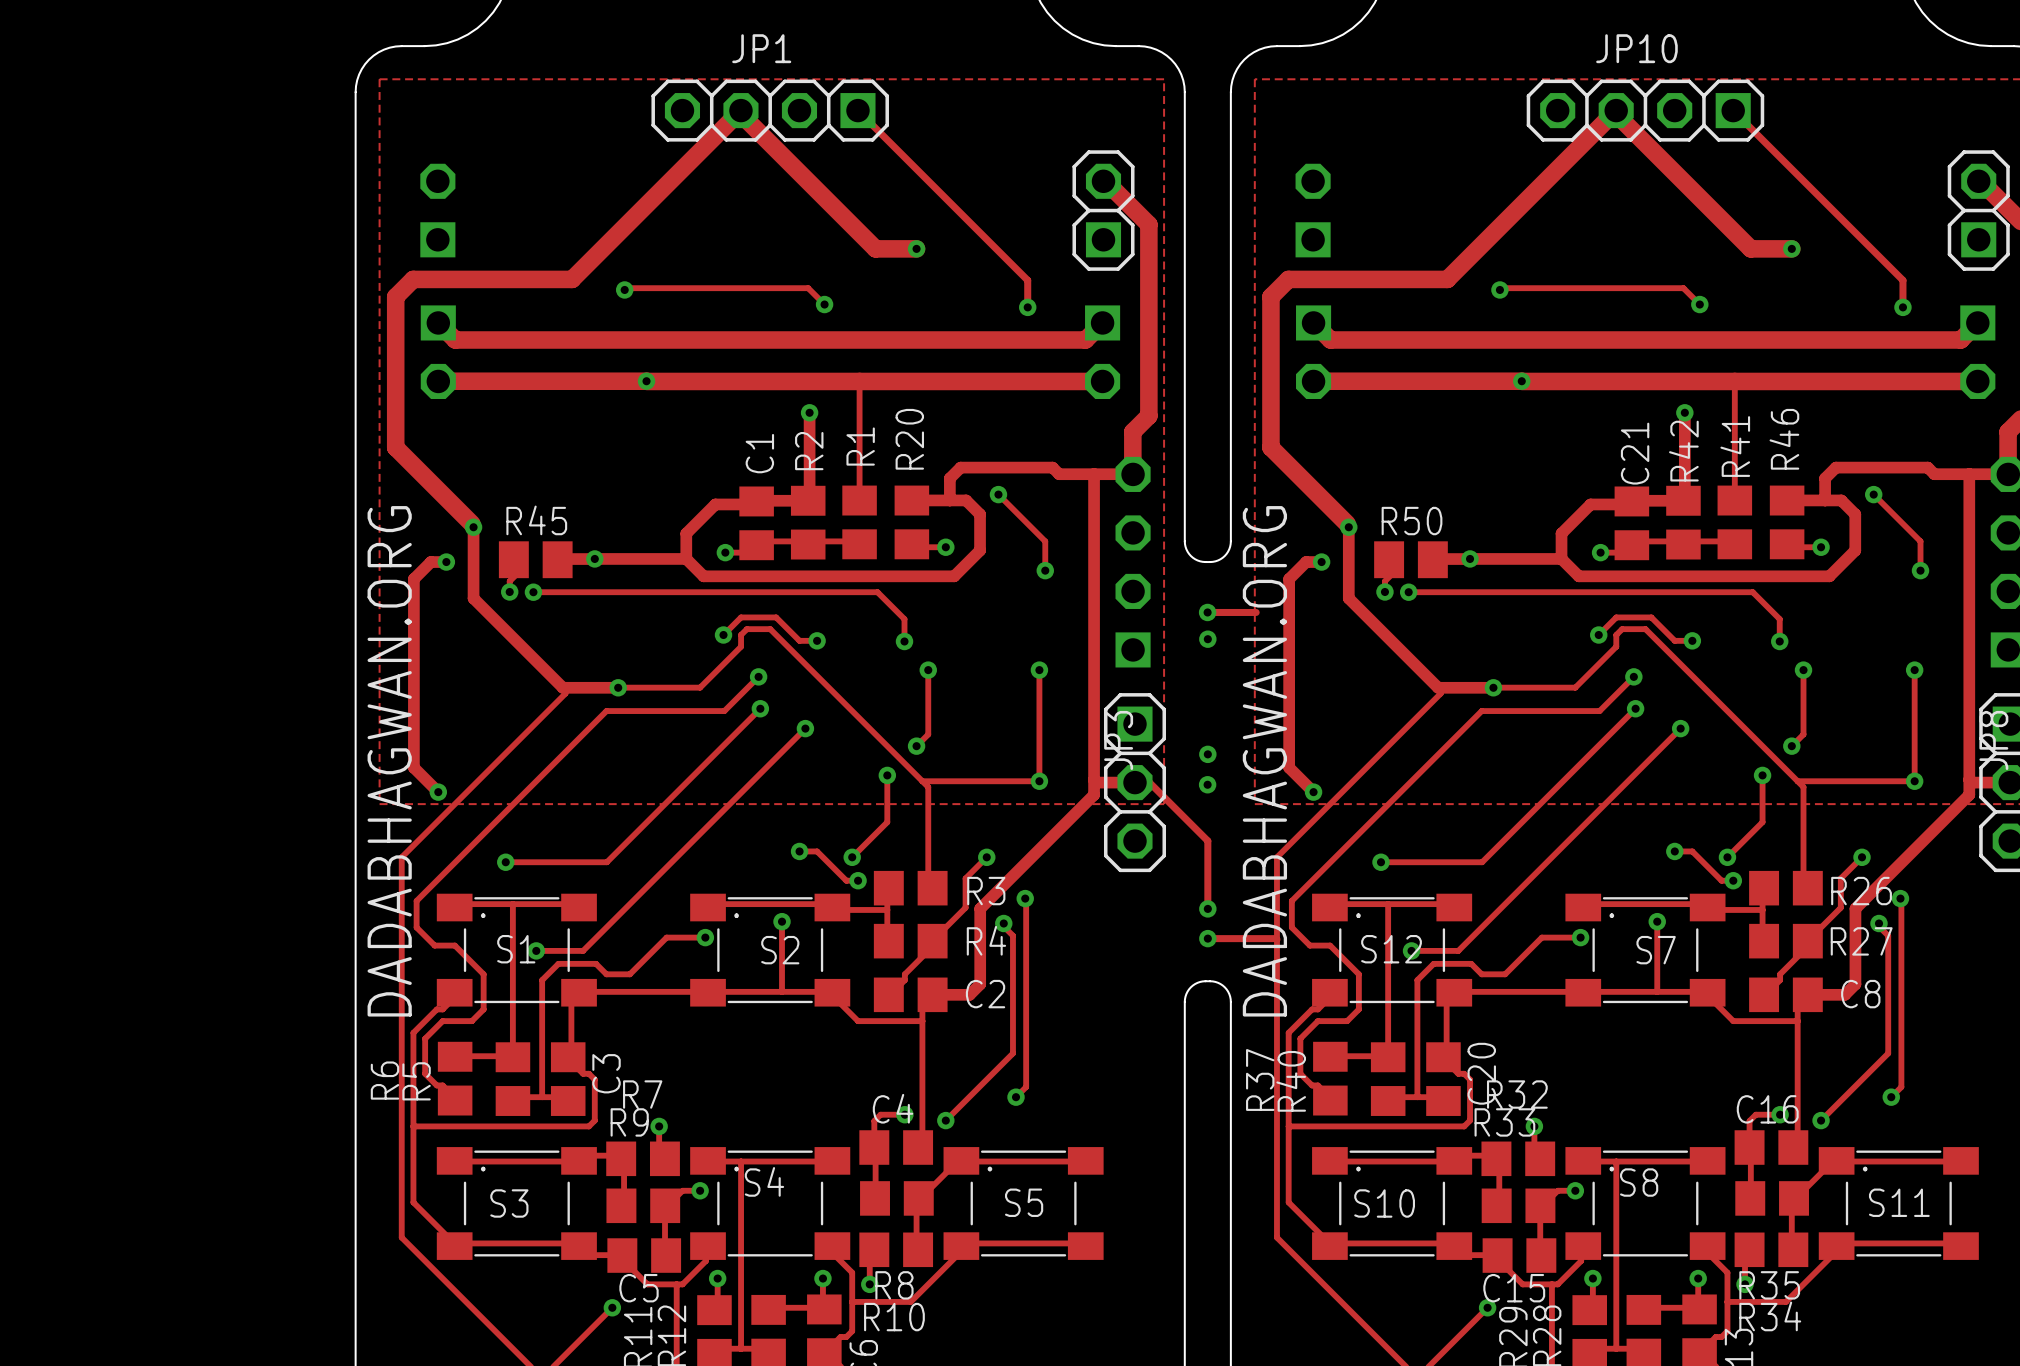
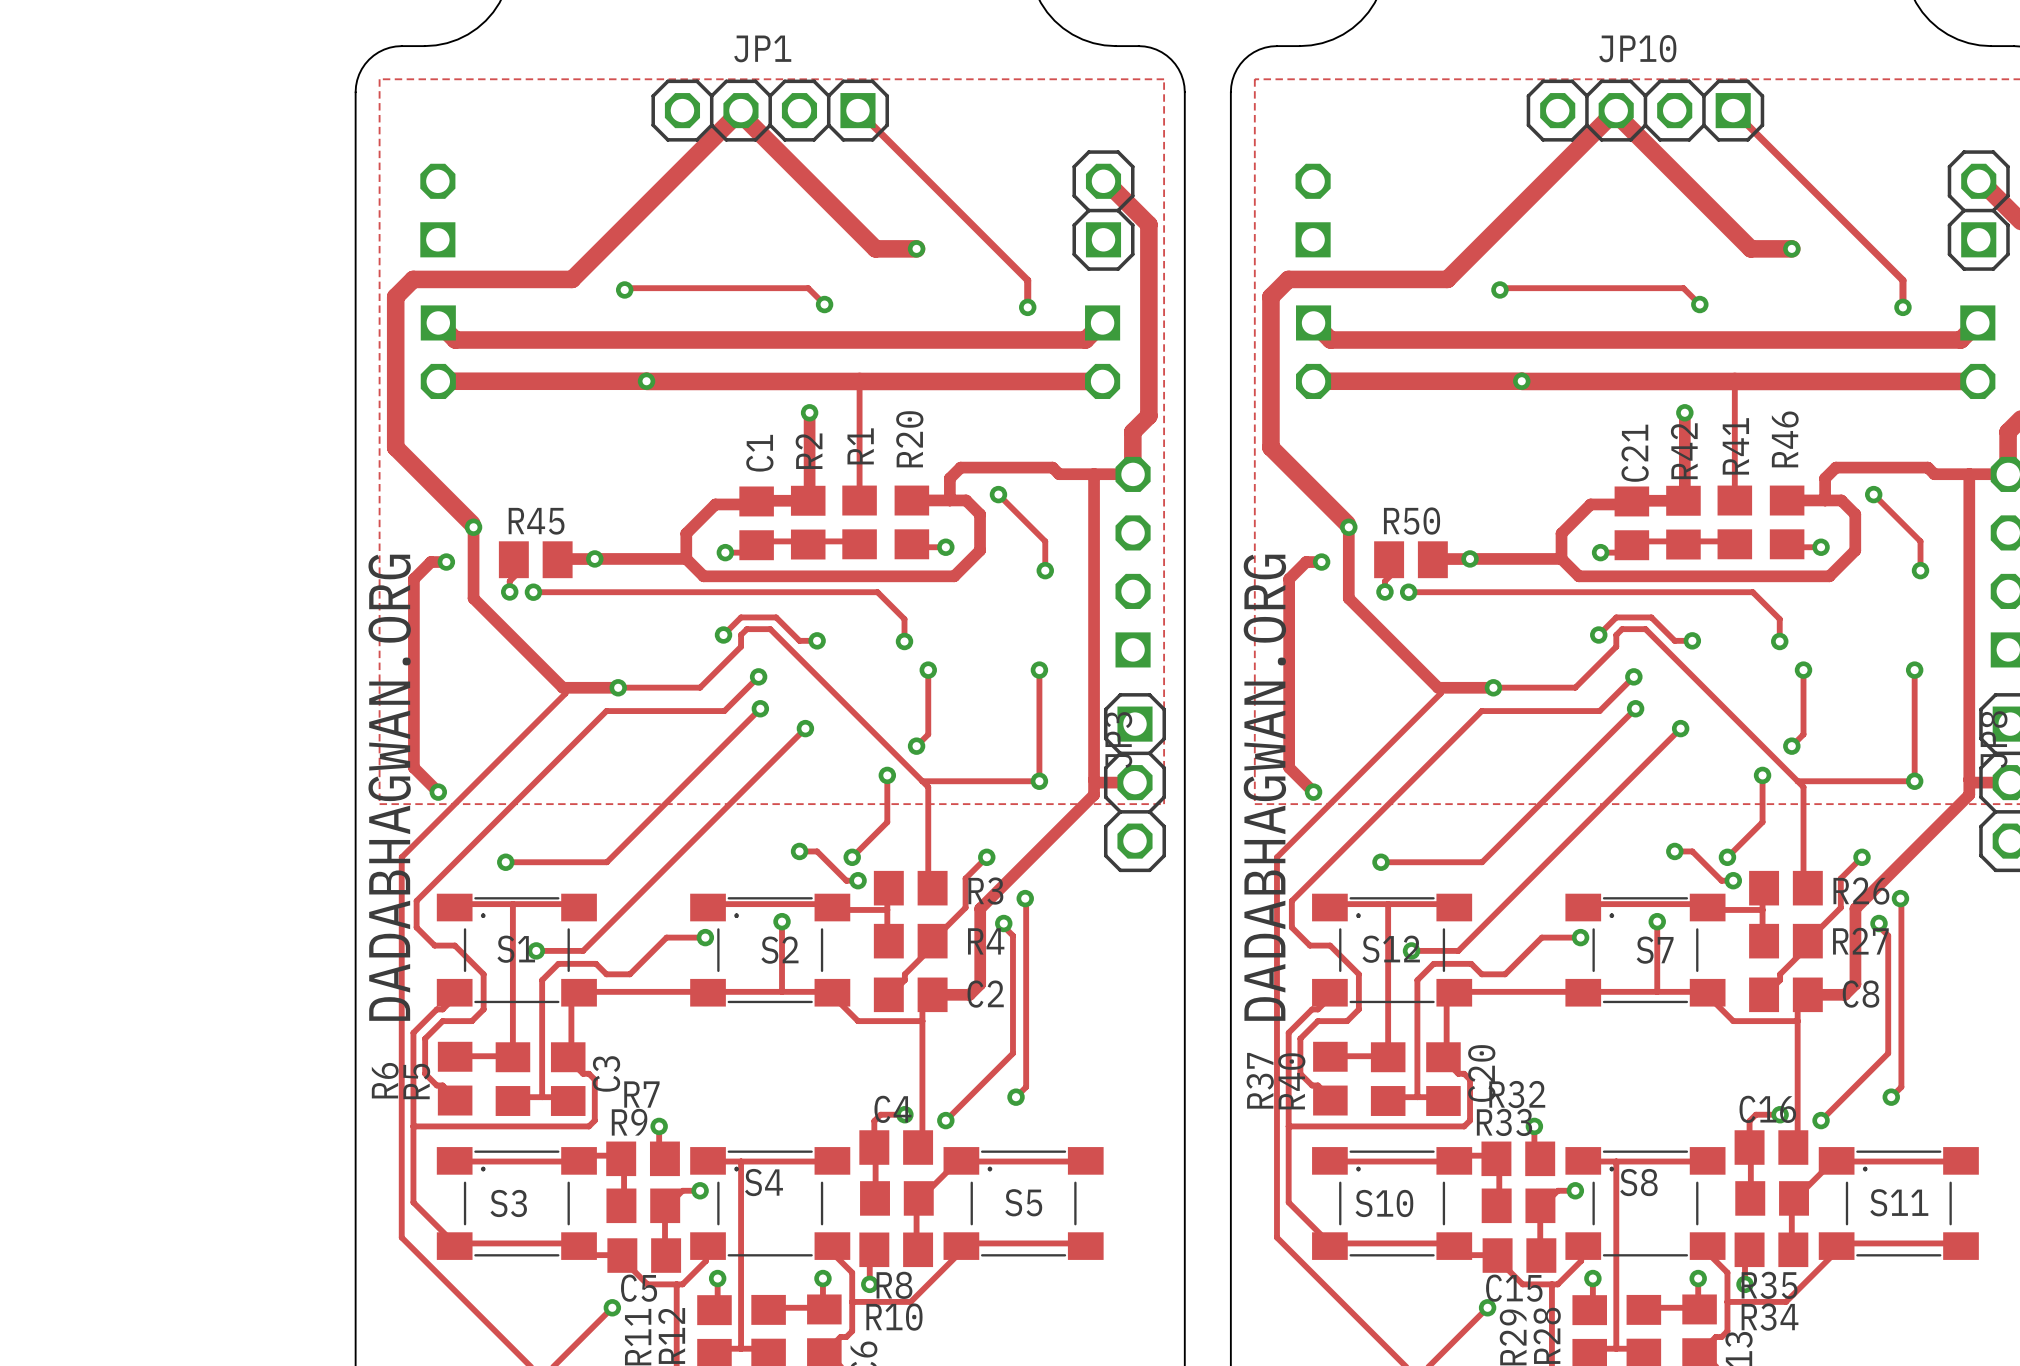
board edge: (1184, 541) (1186, 549) (1190, 555) (1197, 560) (1205, 562) (1215, 561) (1222, 557) (1229, 549) (1230, 541) -> (1184, 541) (1184, 1001)
track: (1207, 612) (1256, 612) -> none
via: (1207, 612) -> none
via: (1207, 639) -> none
via: (1207, 754) -> none
track: (1134, 782) (1149, 782) (1207, 840) (1207, 908) -> none
via: (1207, 784) -> none
via: (1207, 908) -> none
track: (1207, 938) (1276, 939) -> none
via: (1207, 938) -> none
board edge: (1184, 1001) (1186, 994) (1190, 987) (1197, 982) (1205, 981) (1215, 981) (1222, 985) (1229, 994) (1230, 1001) -> (1230, 541) (1230, 1001)

